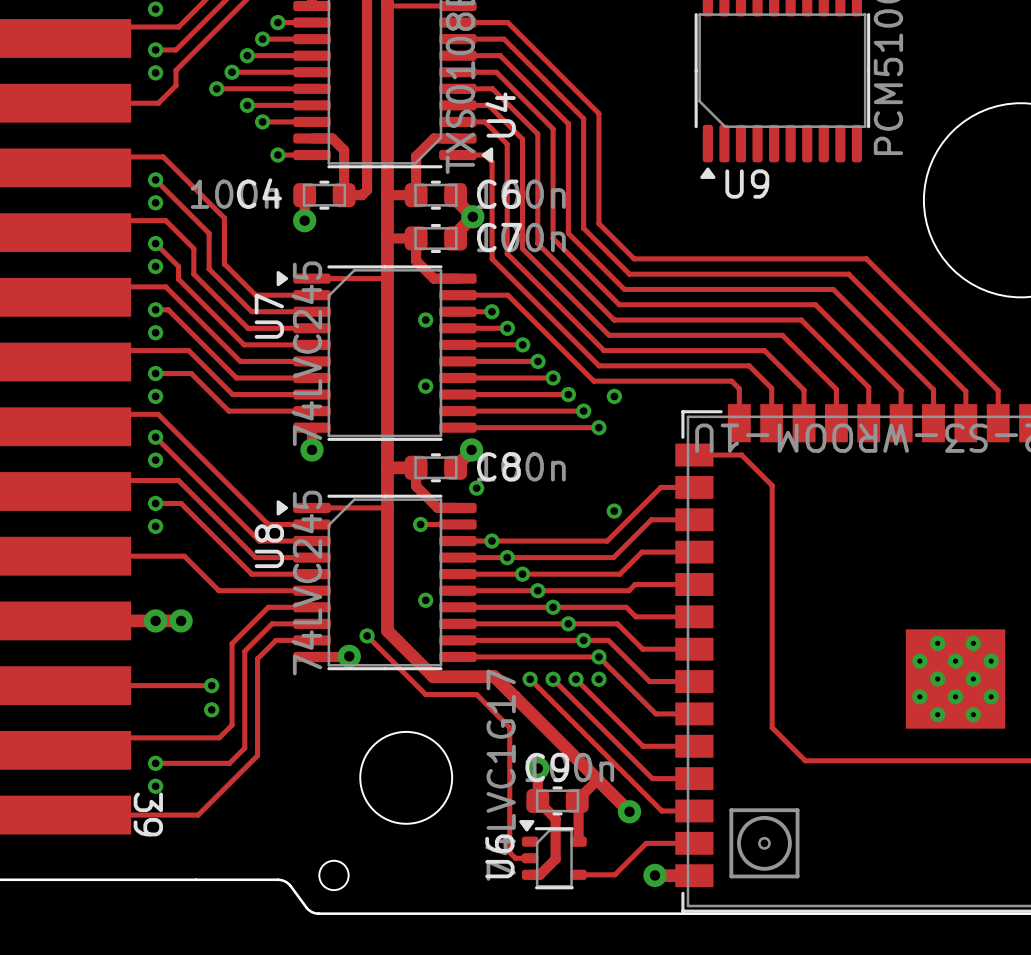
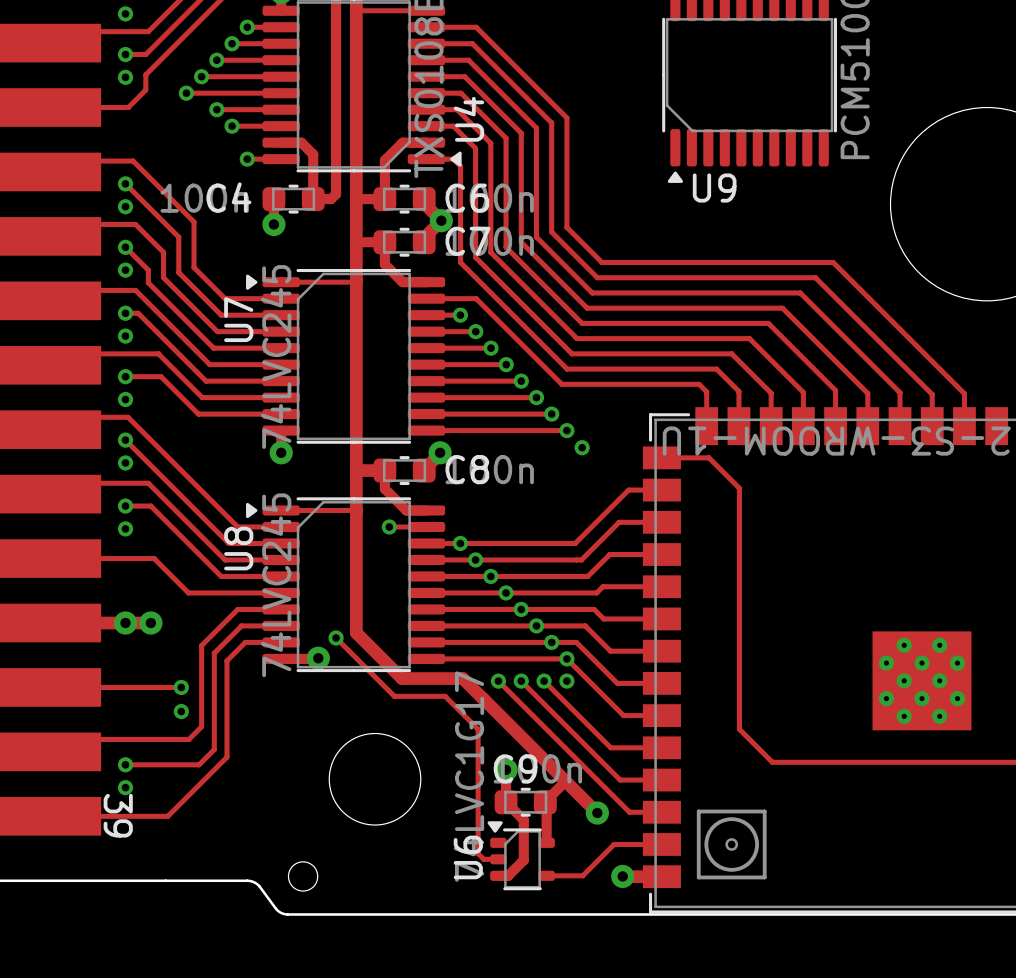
via: (425, 320) -> none
via: (425, 386) -> none
via: (614, 396) -> none
via: none -> (582, 447)
via: (476, 488) -> none
via: (614, 511) -> none
via: (425, 600) -> none

